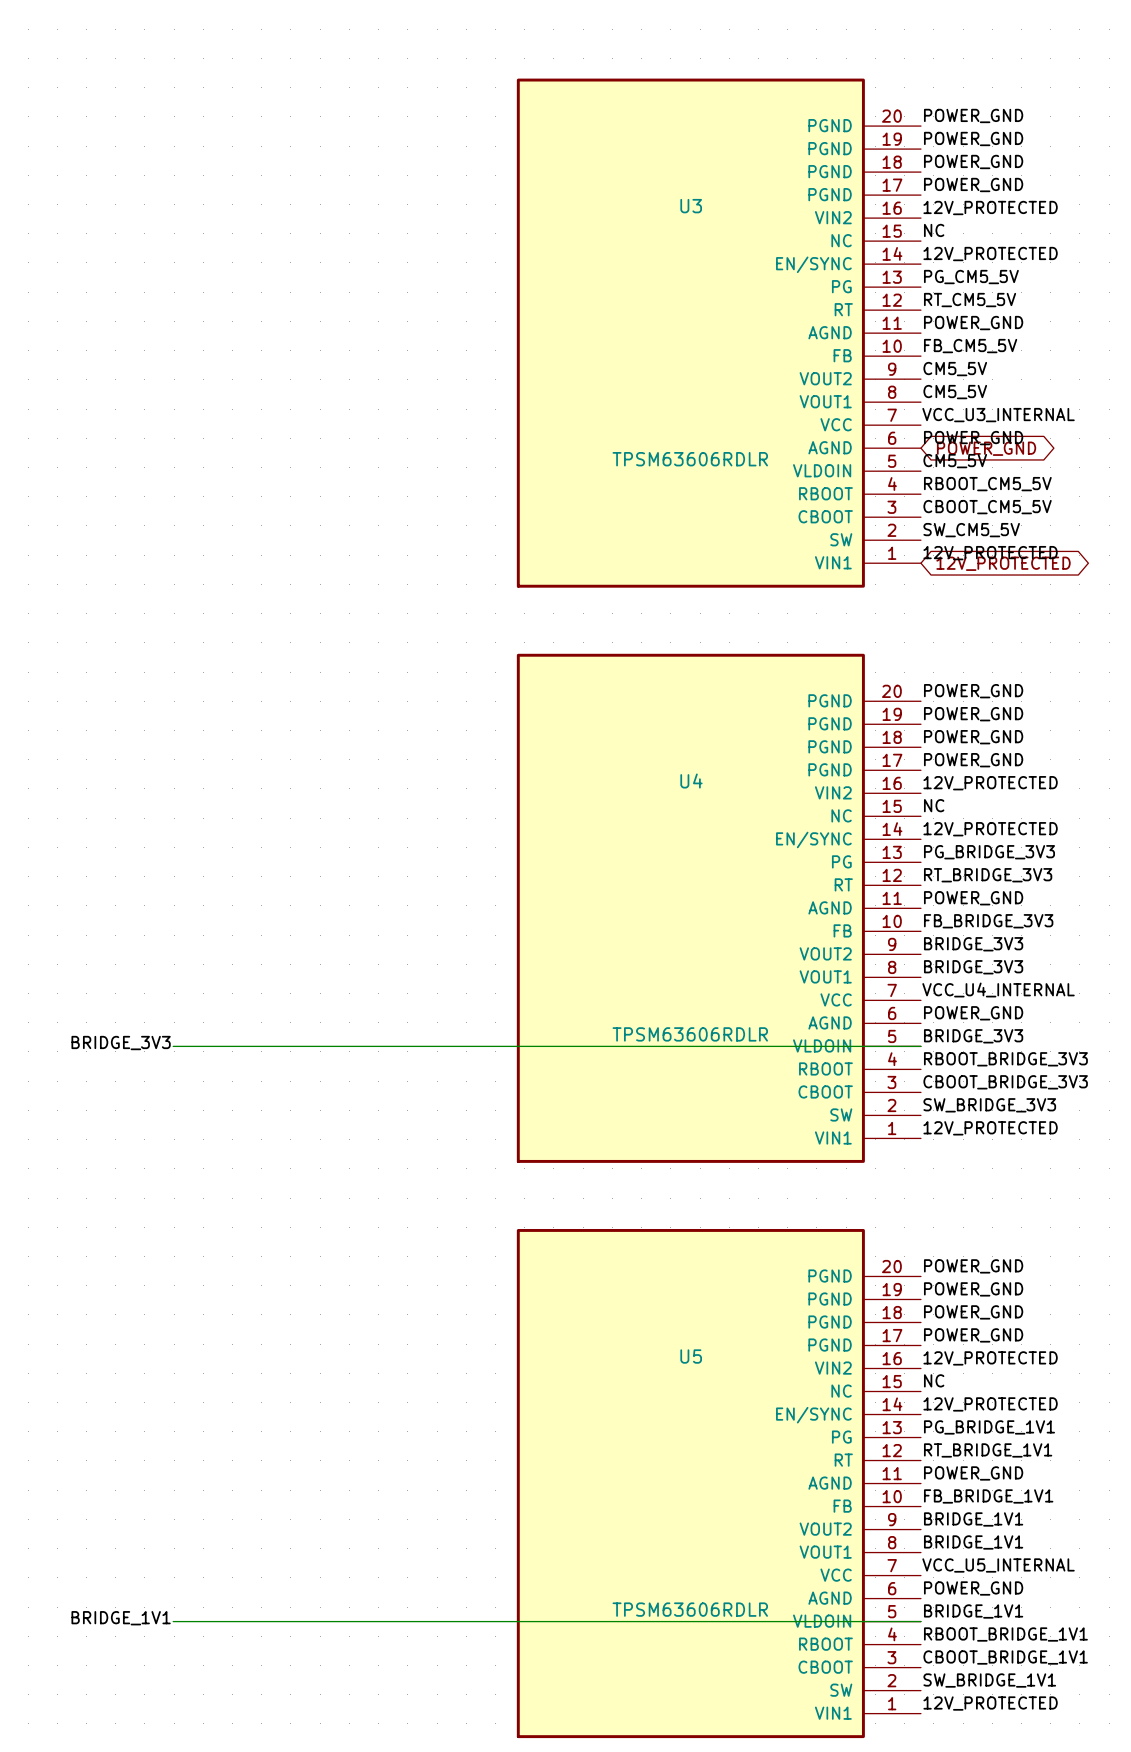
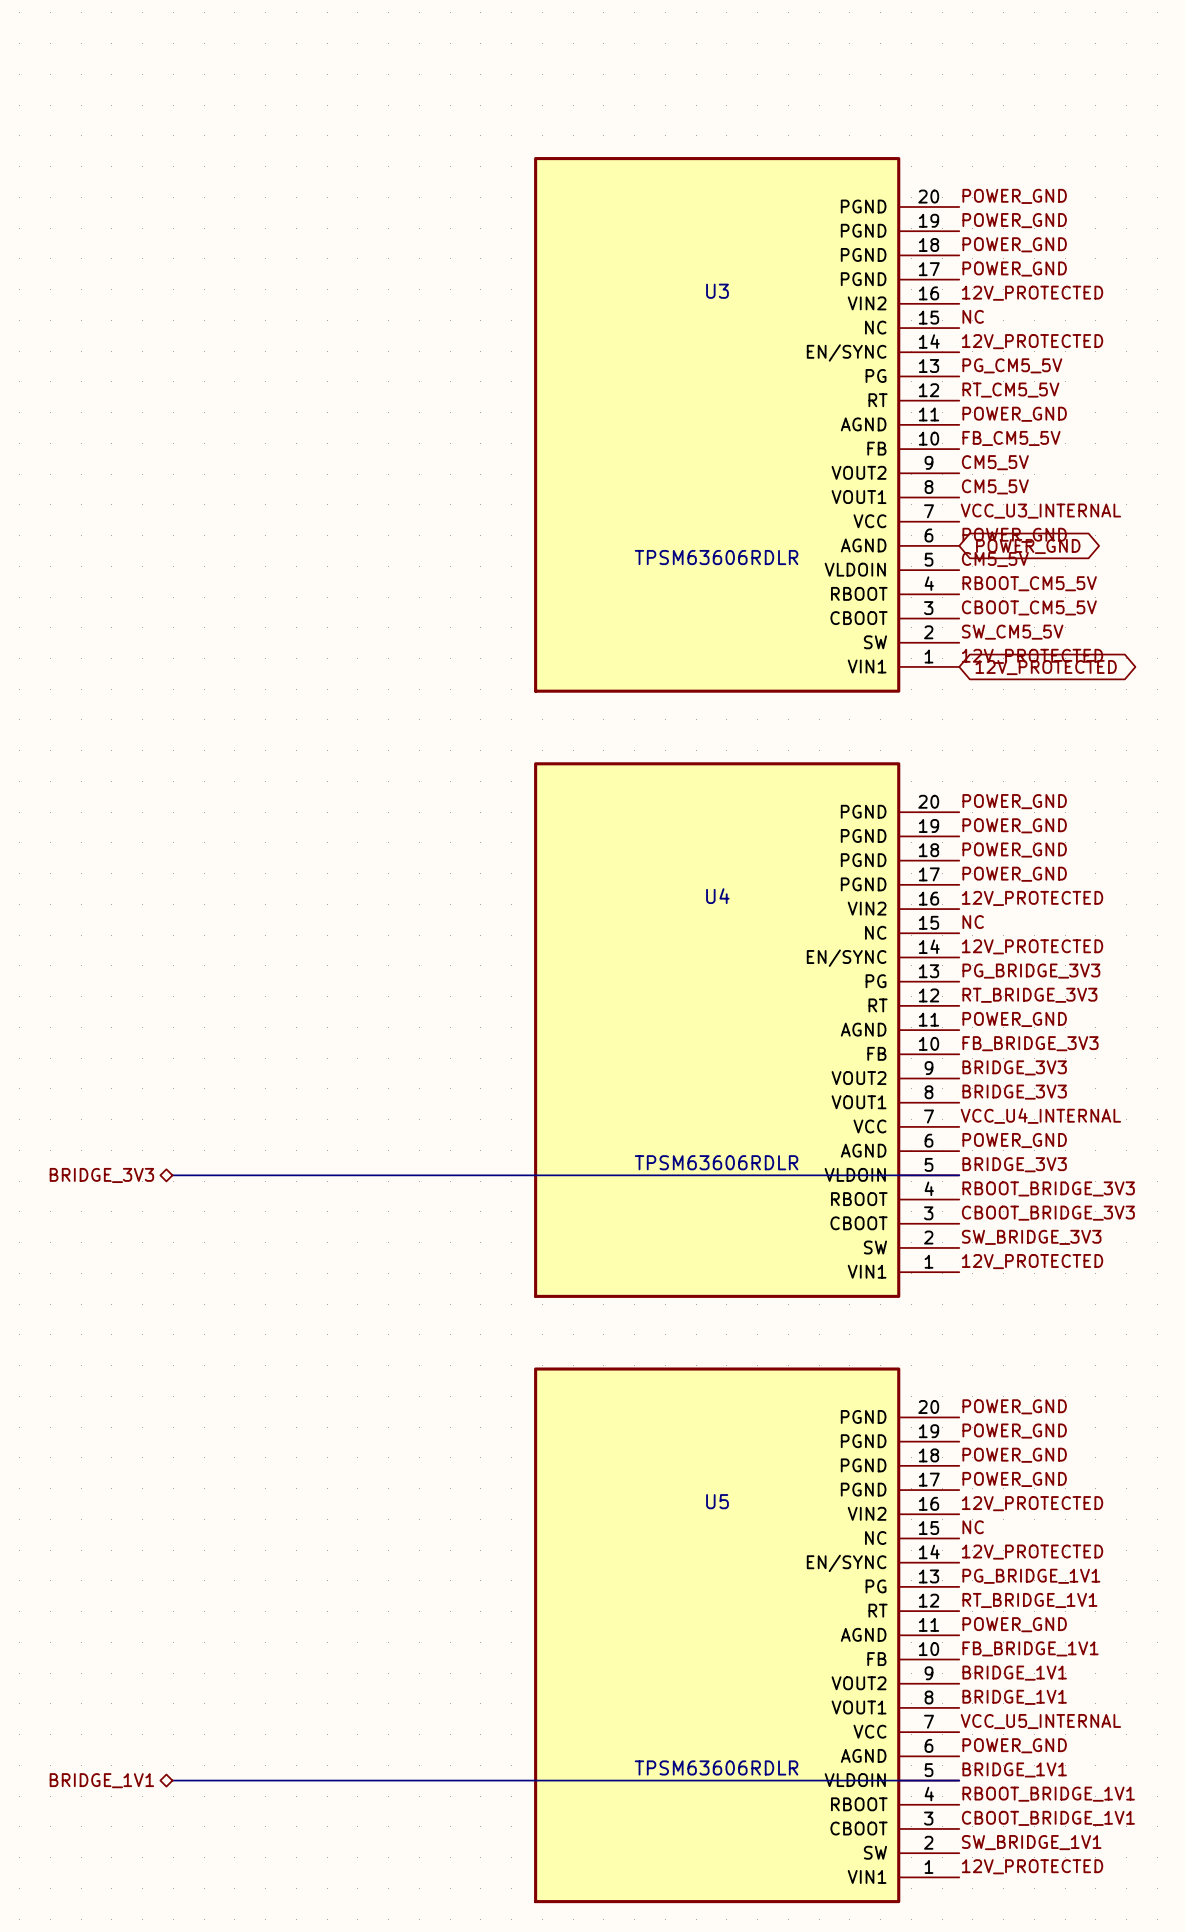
label: BRIDGE_3V3 (121, 1043) -> none
hierarchical label: none -> BRIDGE_3V3 (101, 1175)
label: BRIDGE_1V1 (121, 1618) -> none
hierarchical label: none -> BRIDGE_1V1 (101, 1780)

